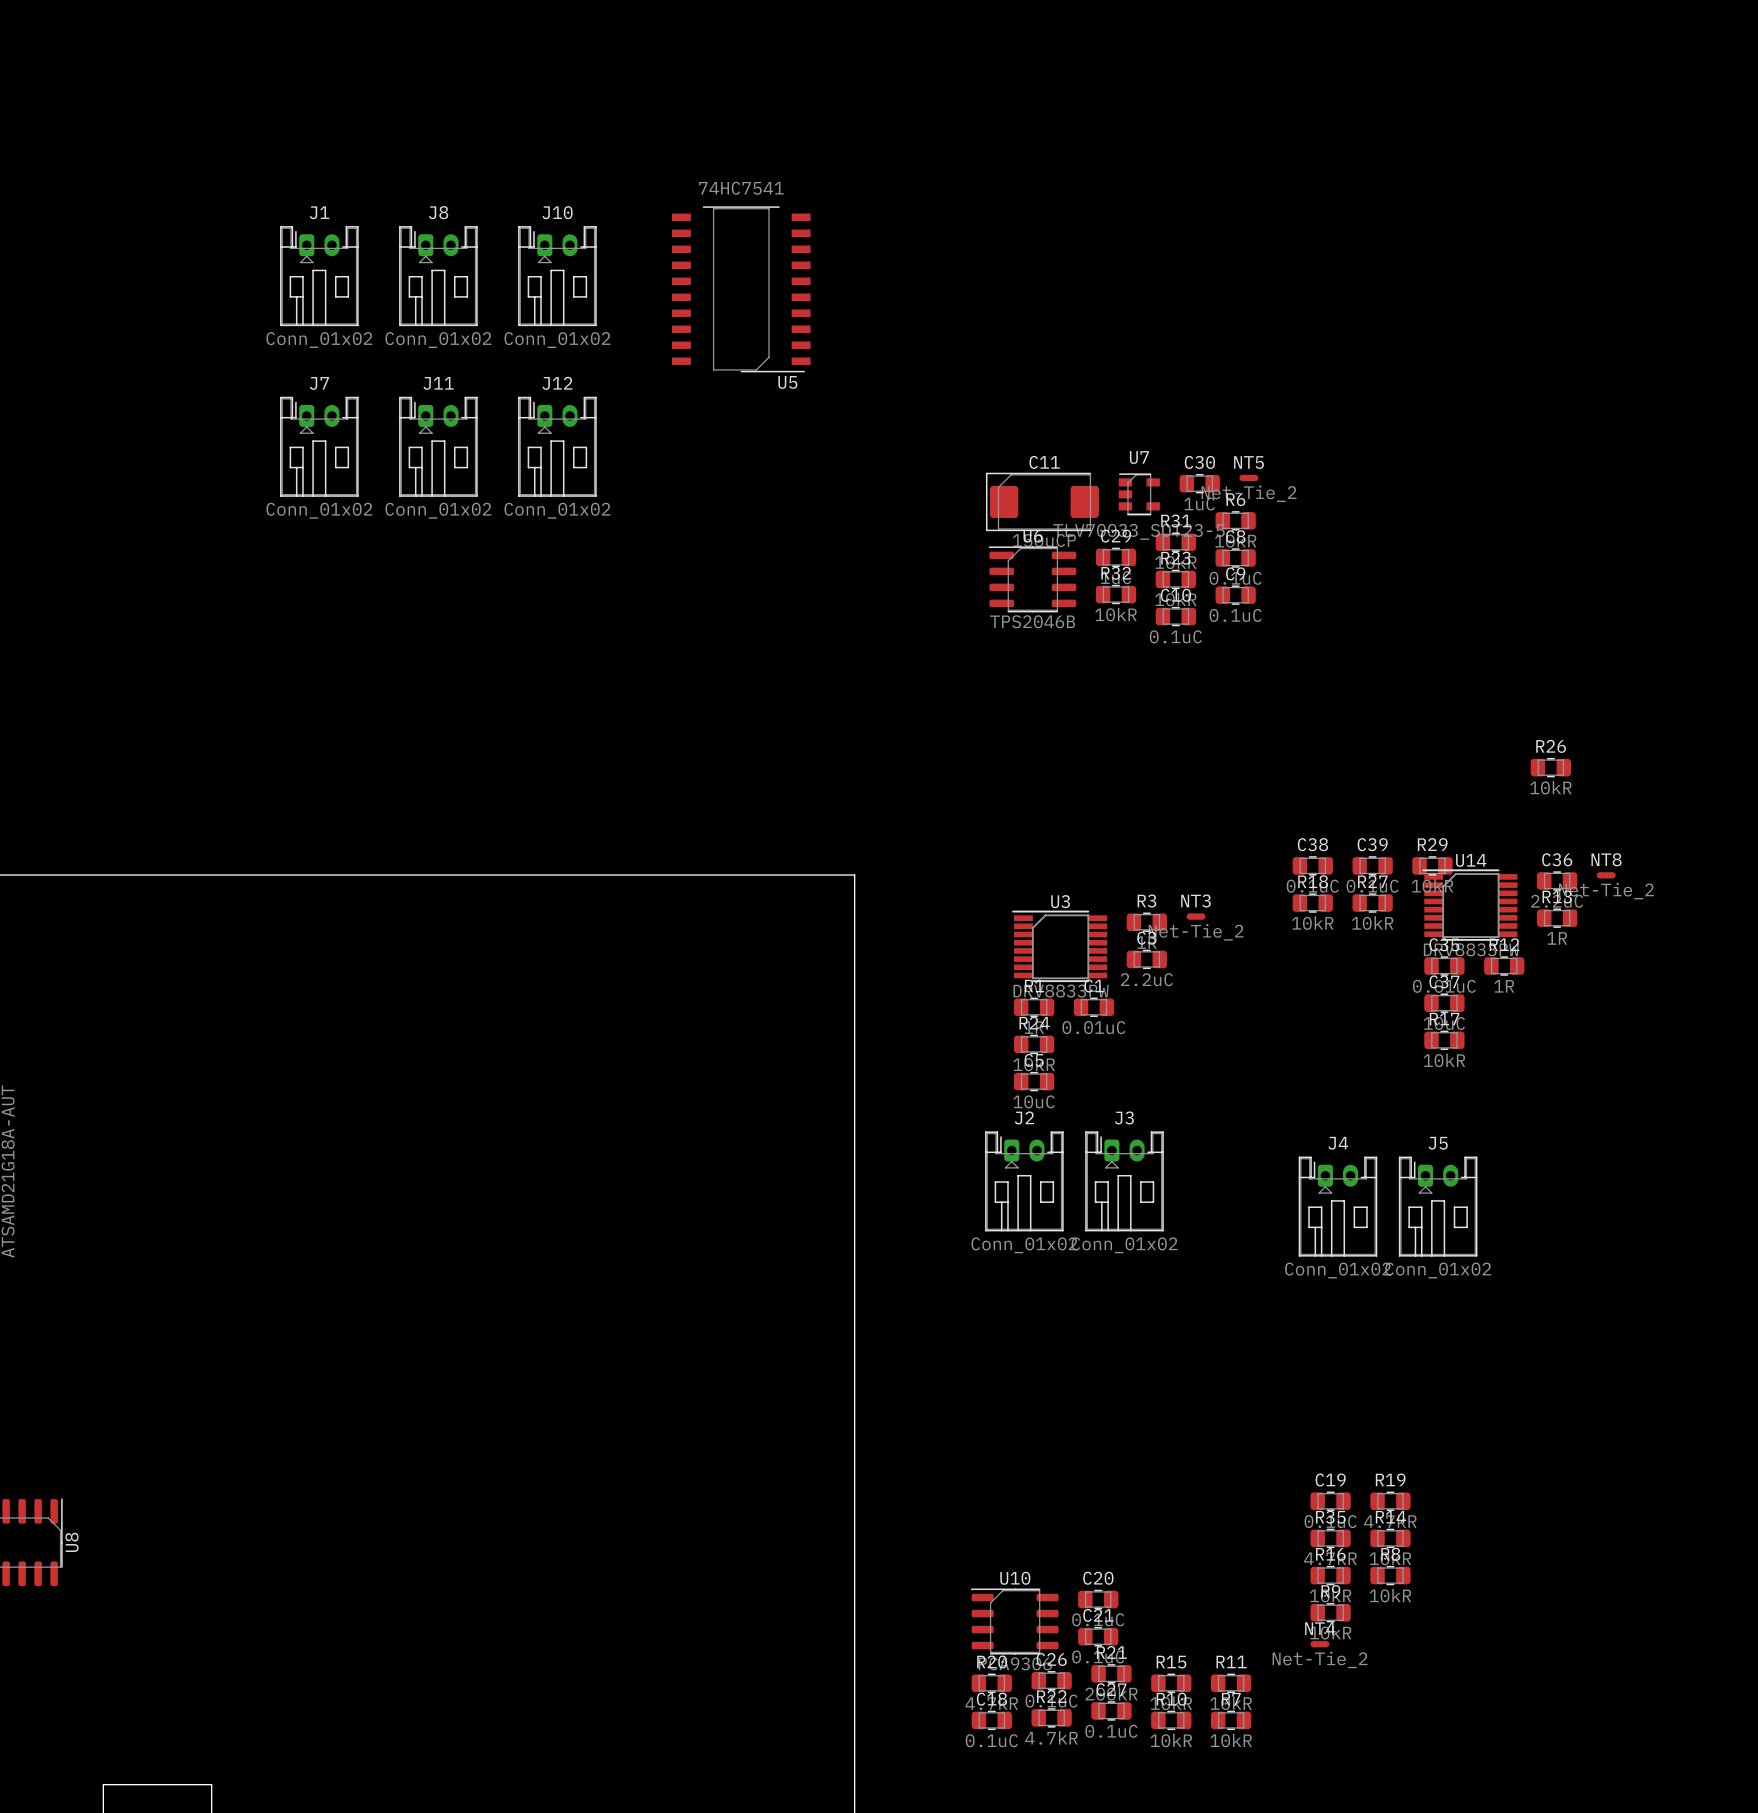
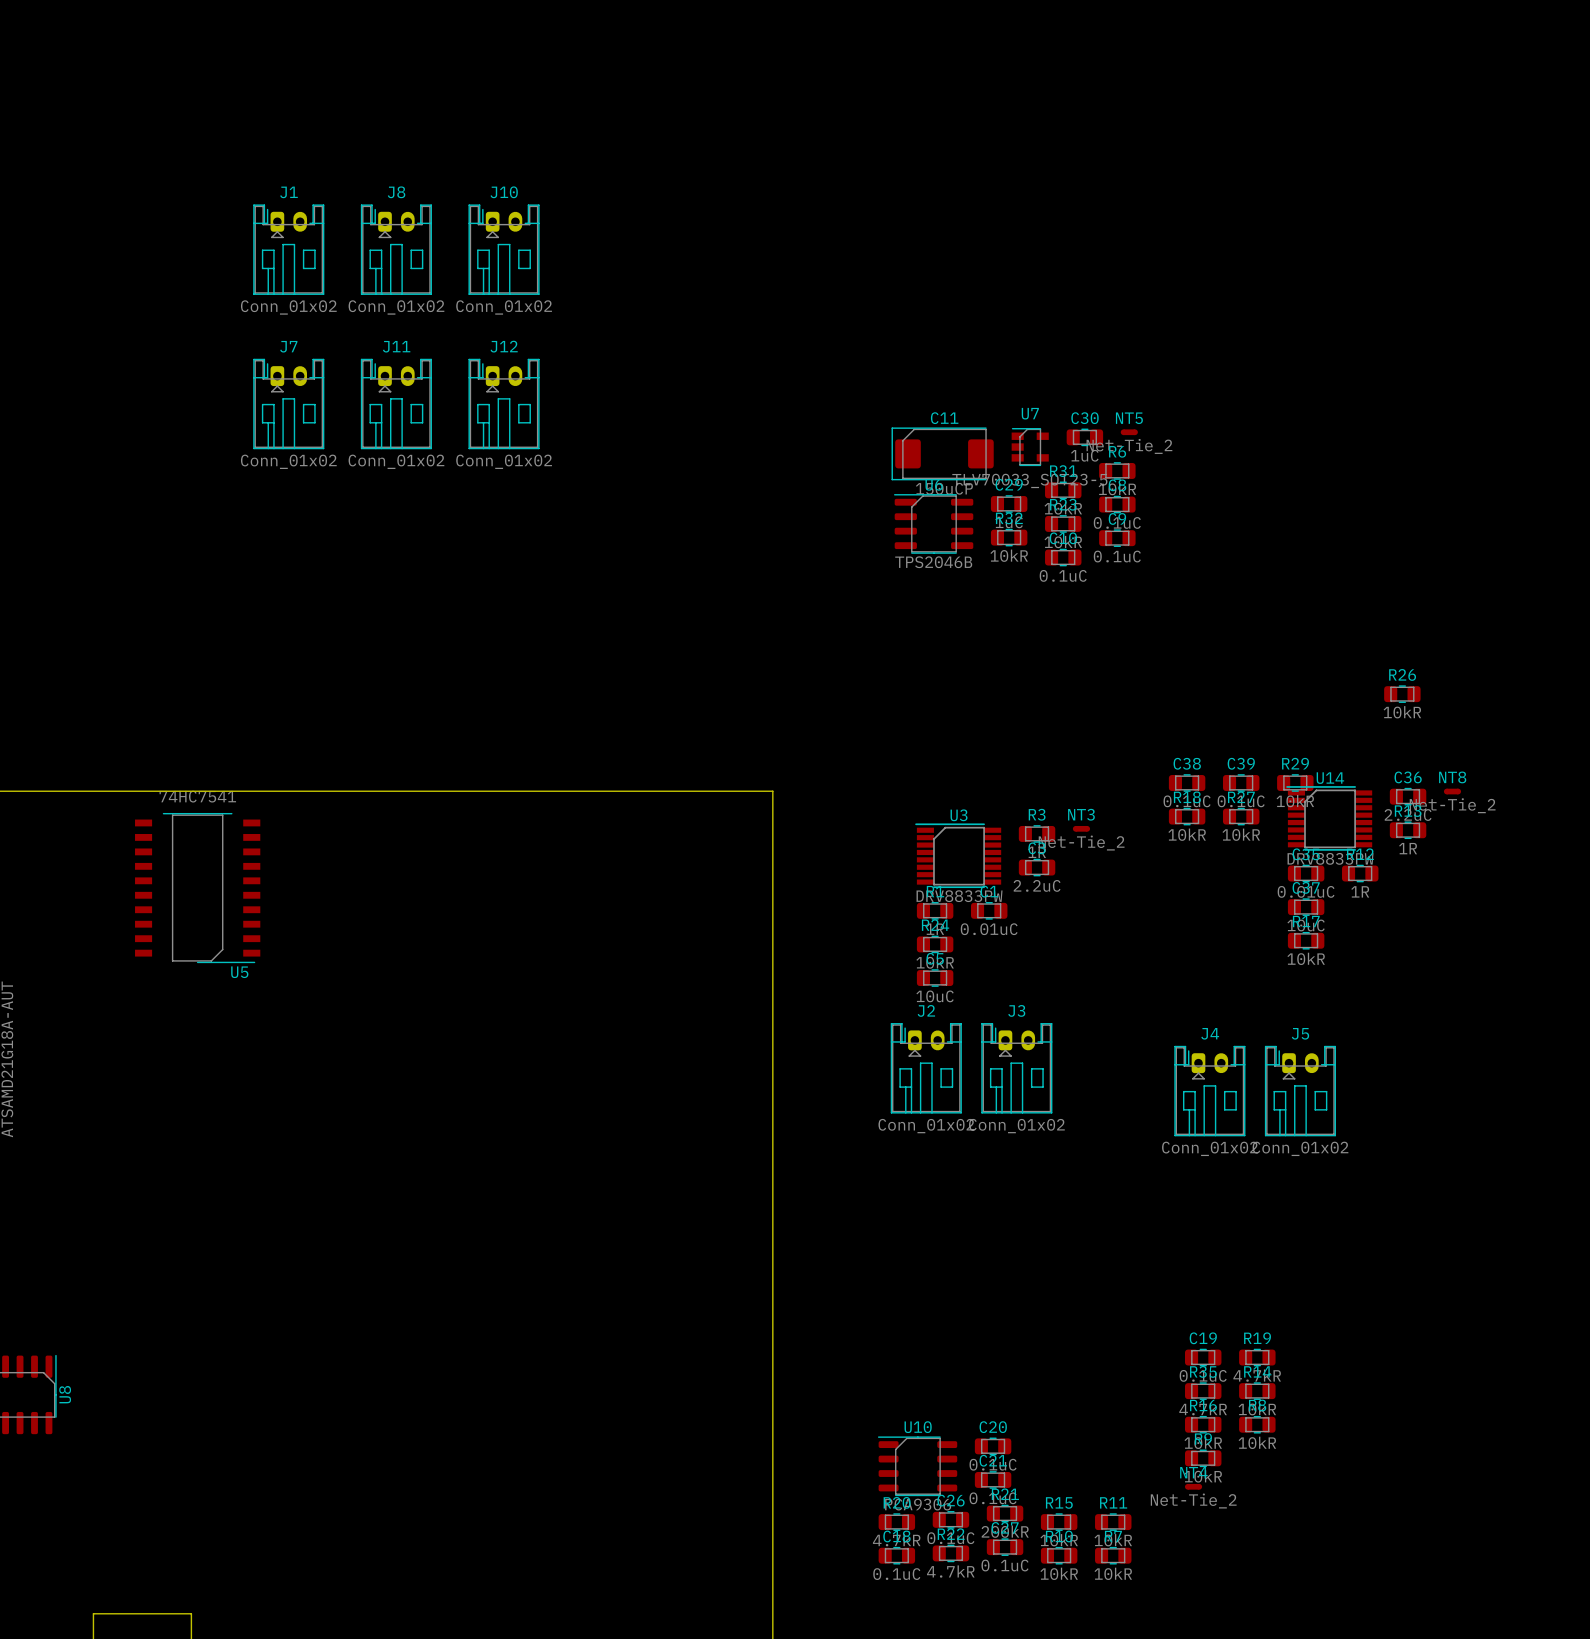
U5 position: (741, 289) -> (197, 888)

